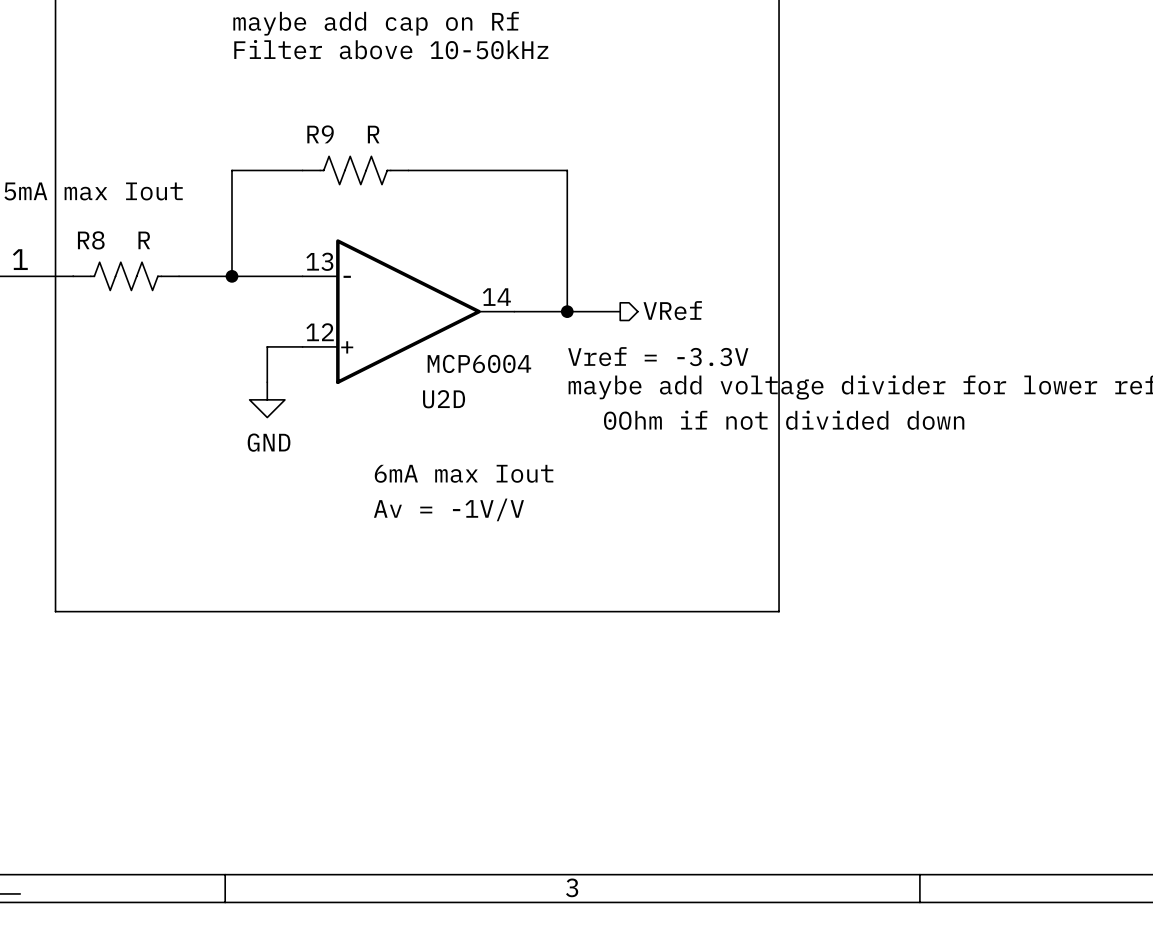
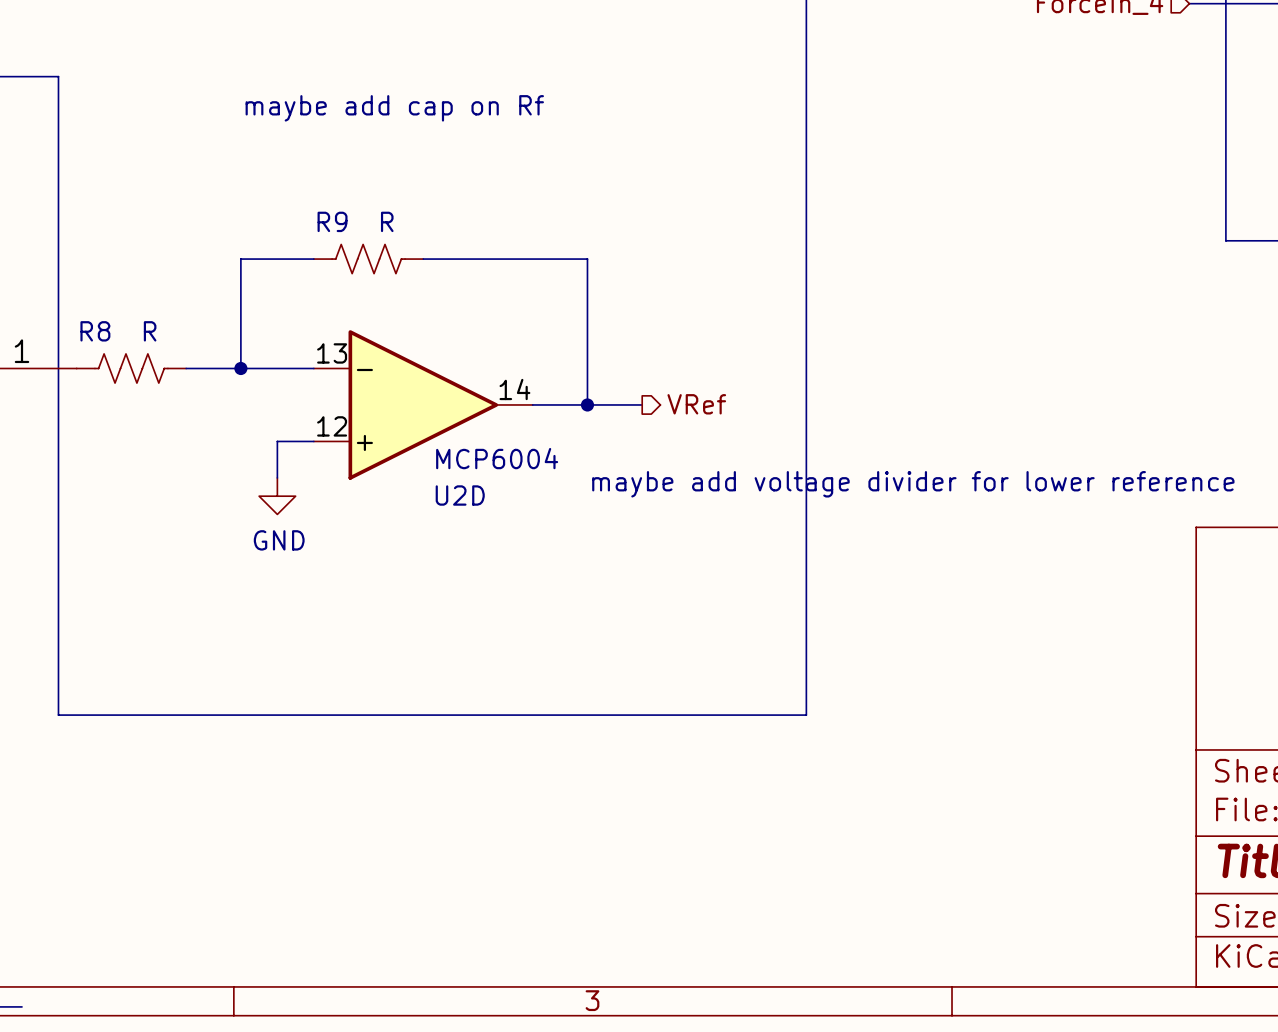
text: Filter above 10-50kHz (391, 49) -> none
text: 5mA max Iout (93, 191) -> none
text: Vref = -3.3V (658, 356) -> none
text: 0Ohm if not divided down (784, 420) -> none
text: 6mA max Iout (464, 473) -> none
text: Av = -1V/V (448, 509) -> none

